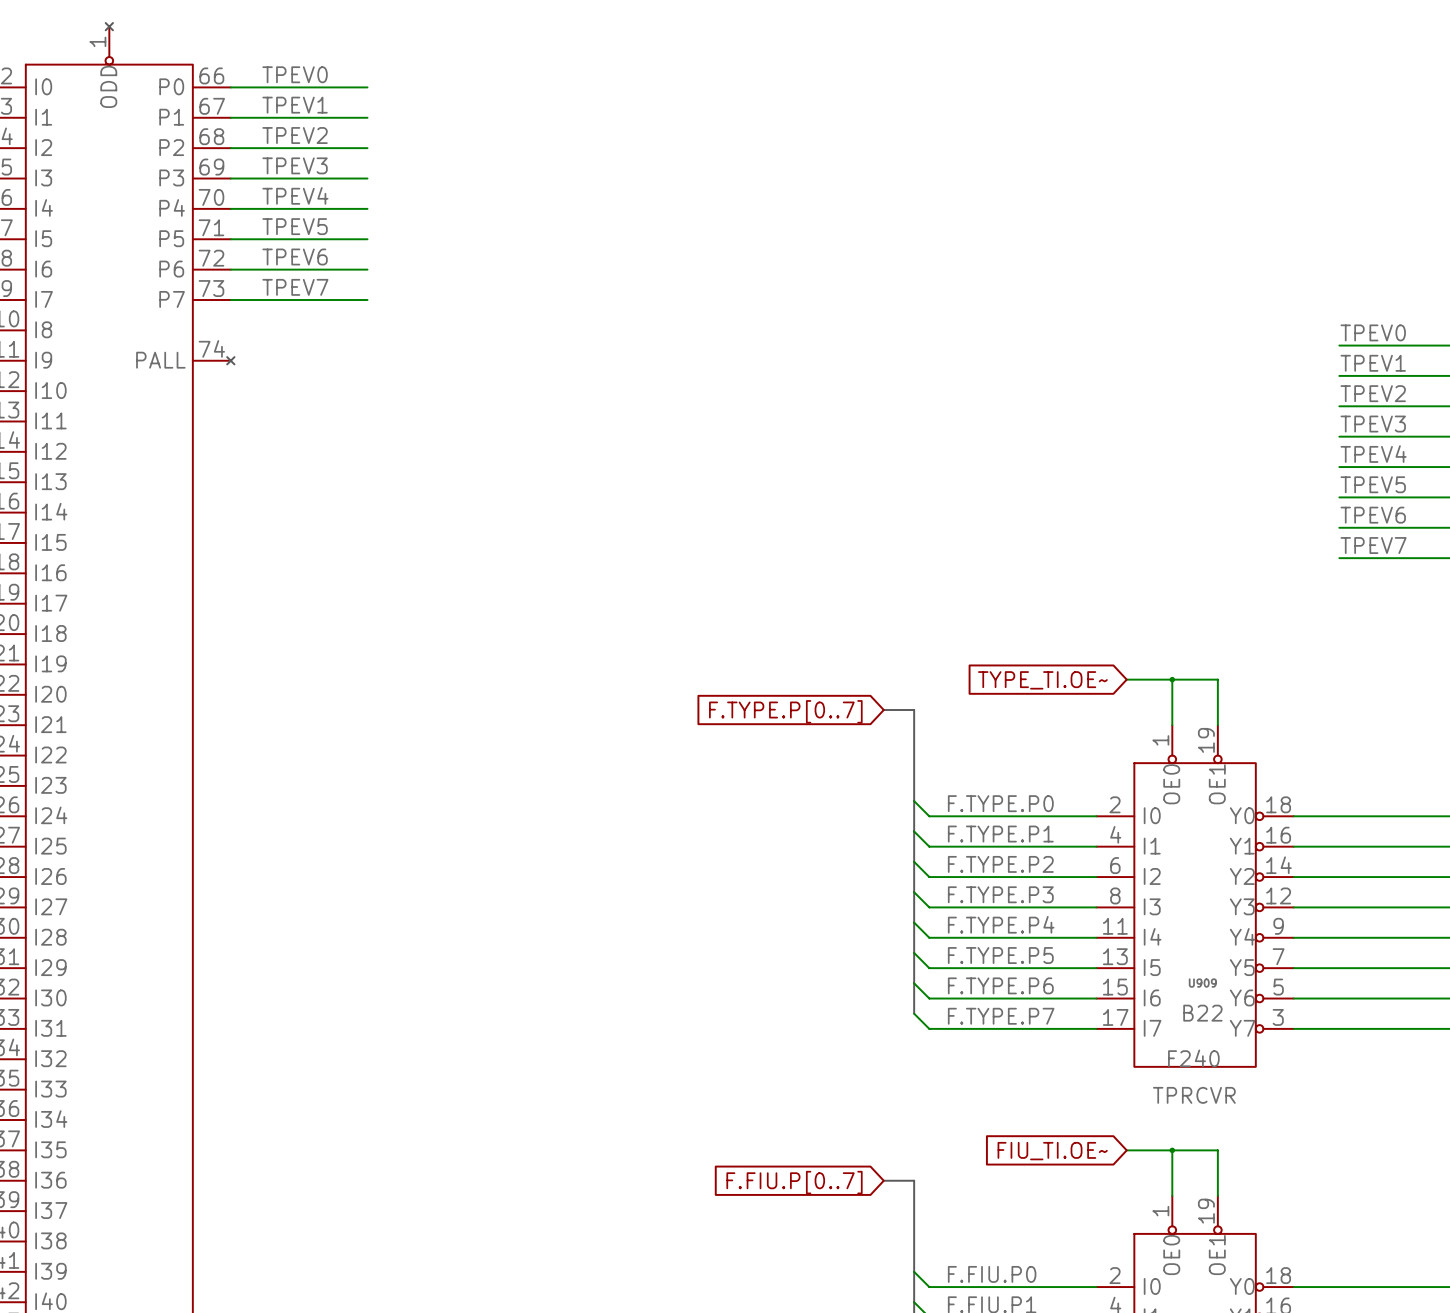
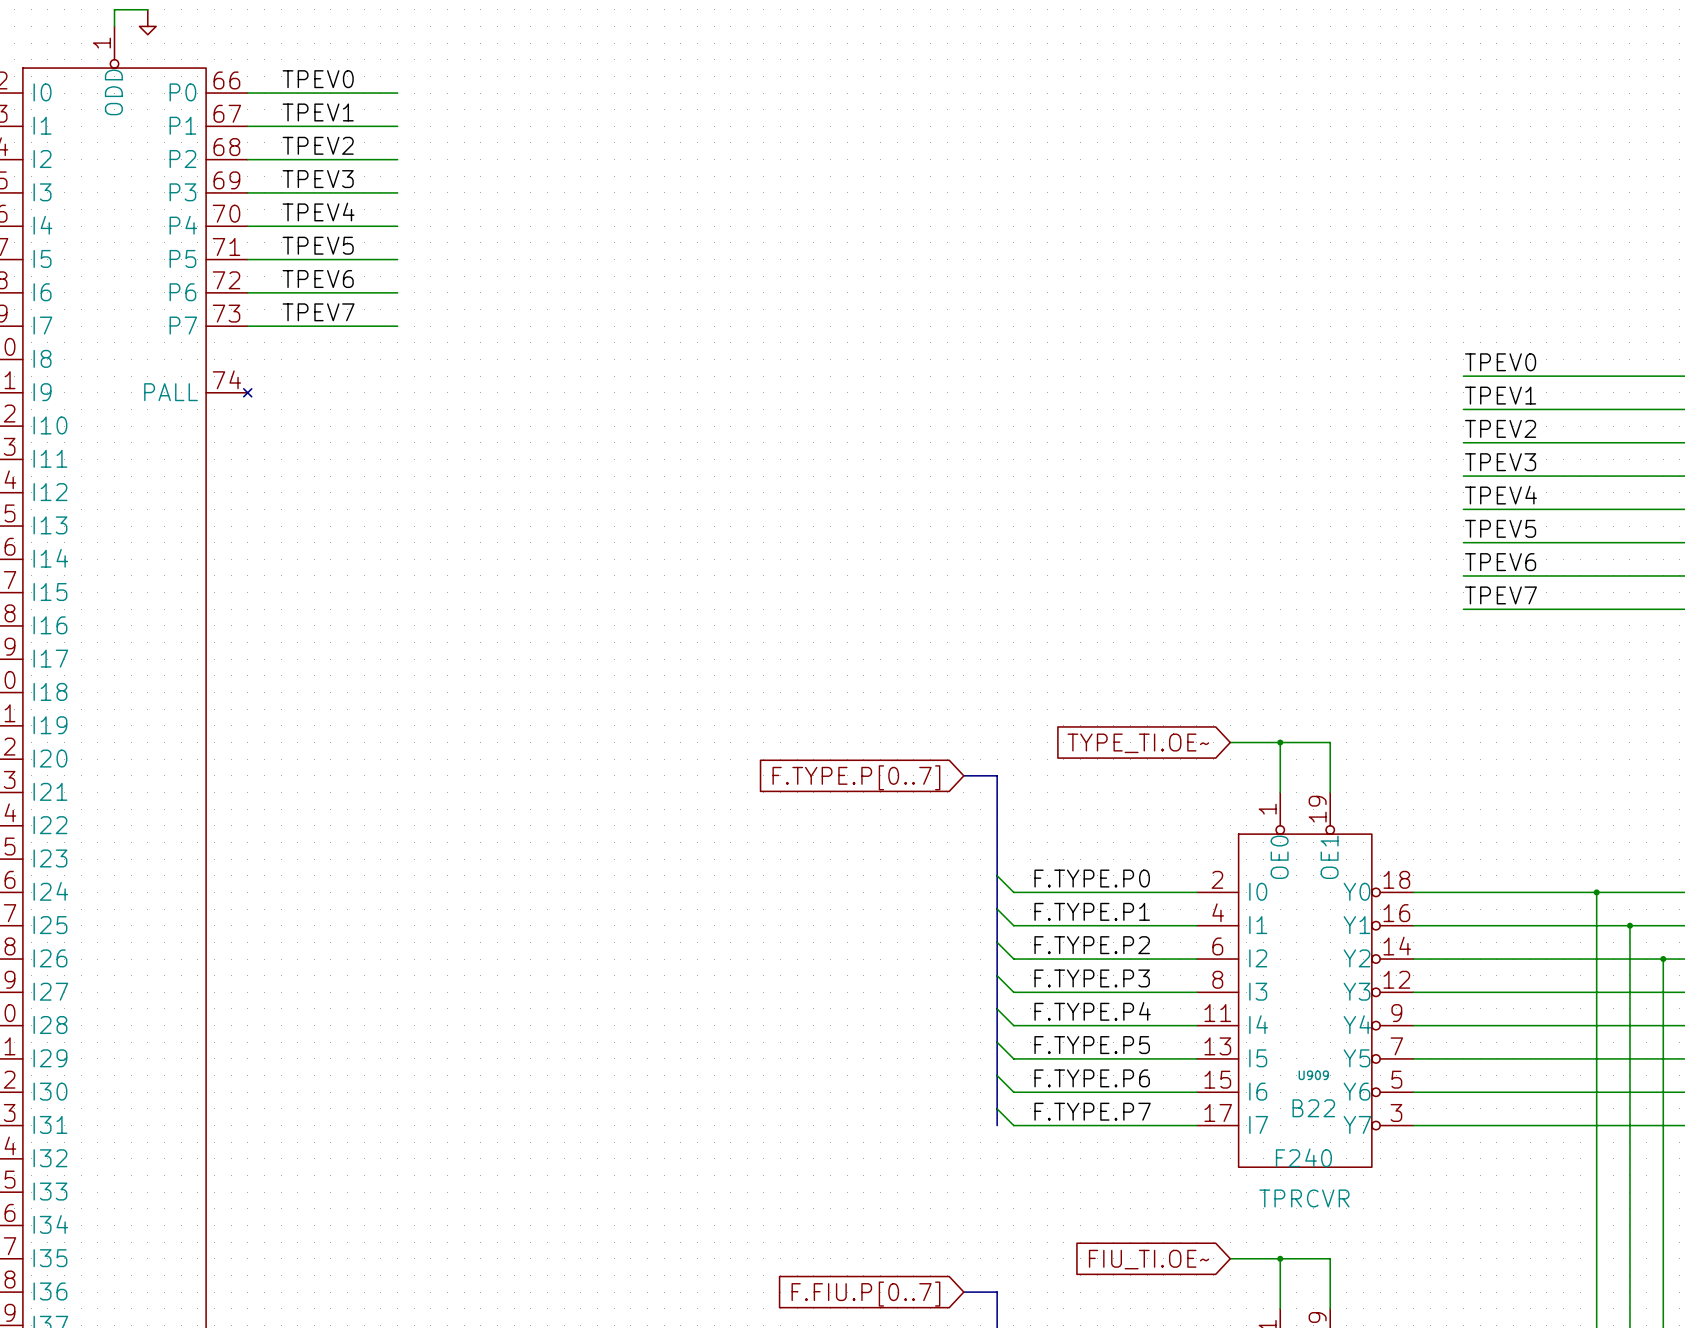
wire: none -> (147, 9) (114, 9) (114, 26)
power symbol: none -> (147, 22)
no-connect mark: (109, 26) -> none
bus: none -> (997, 1108) (997, 1125)

